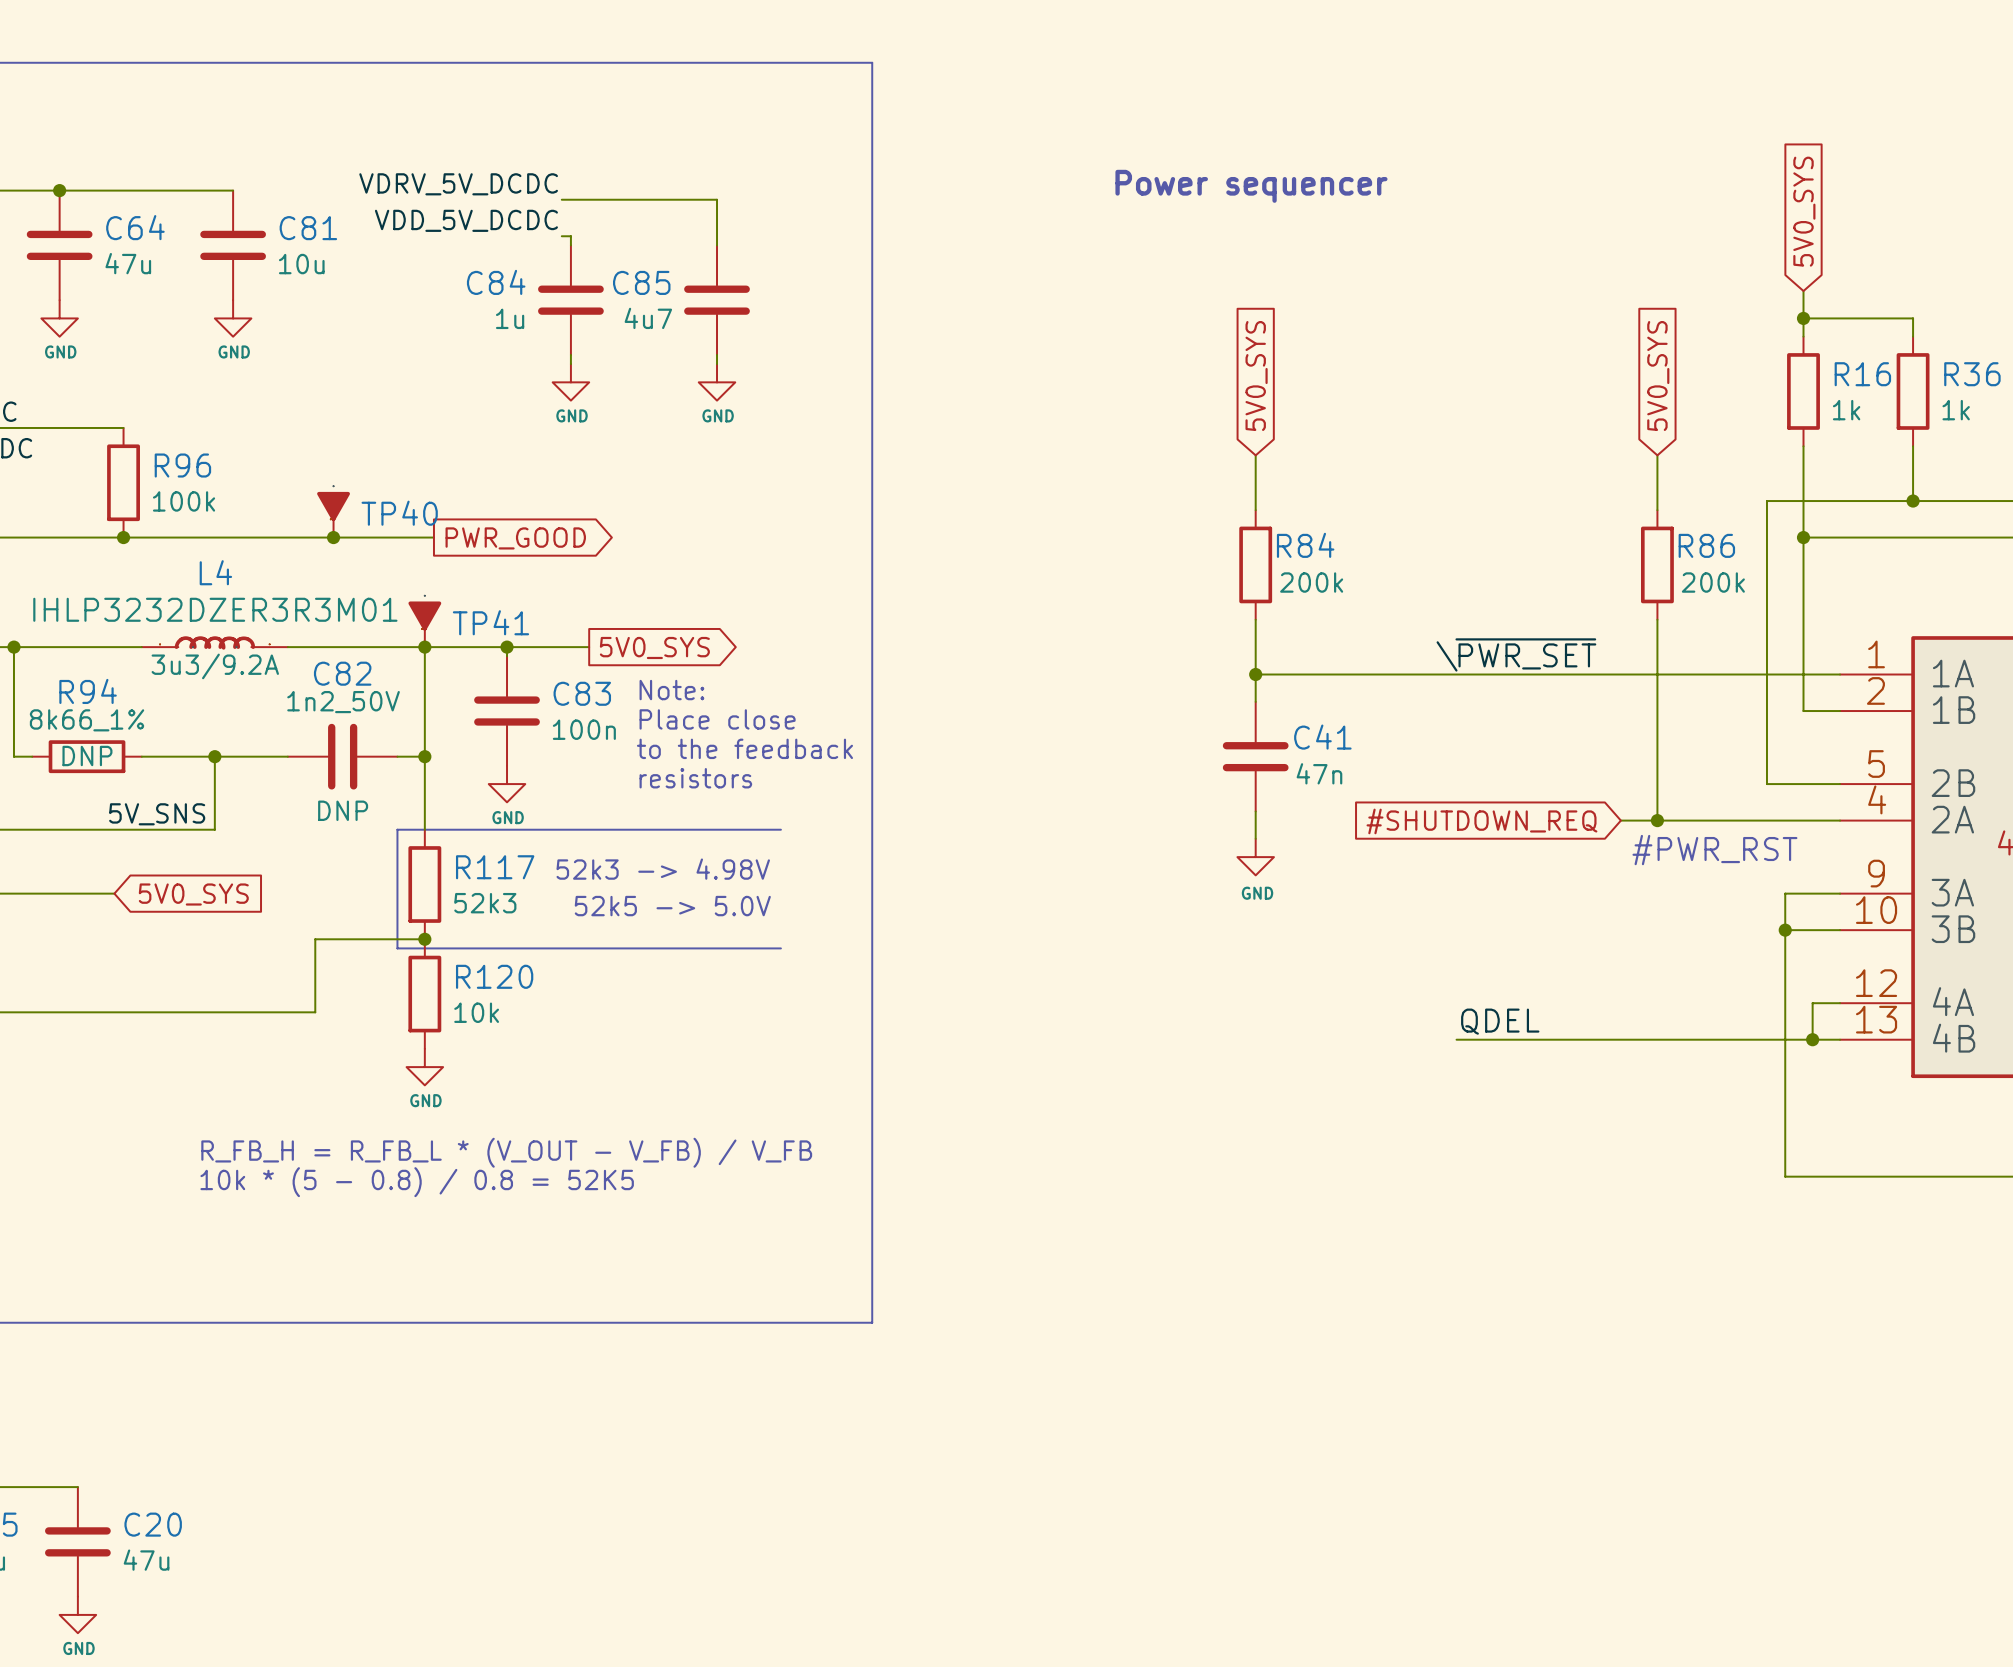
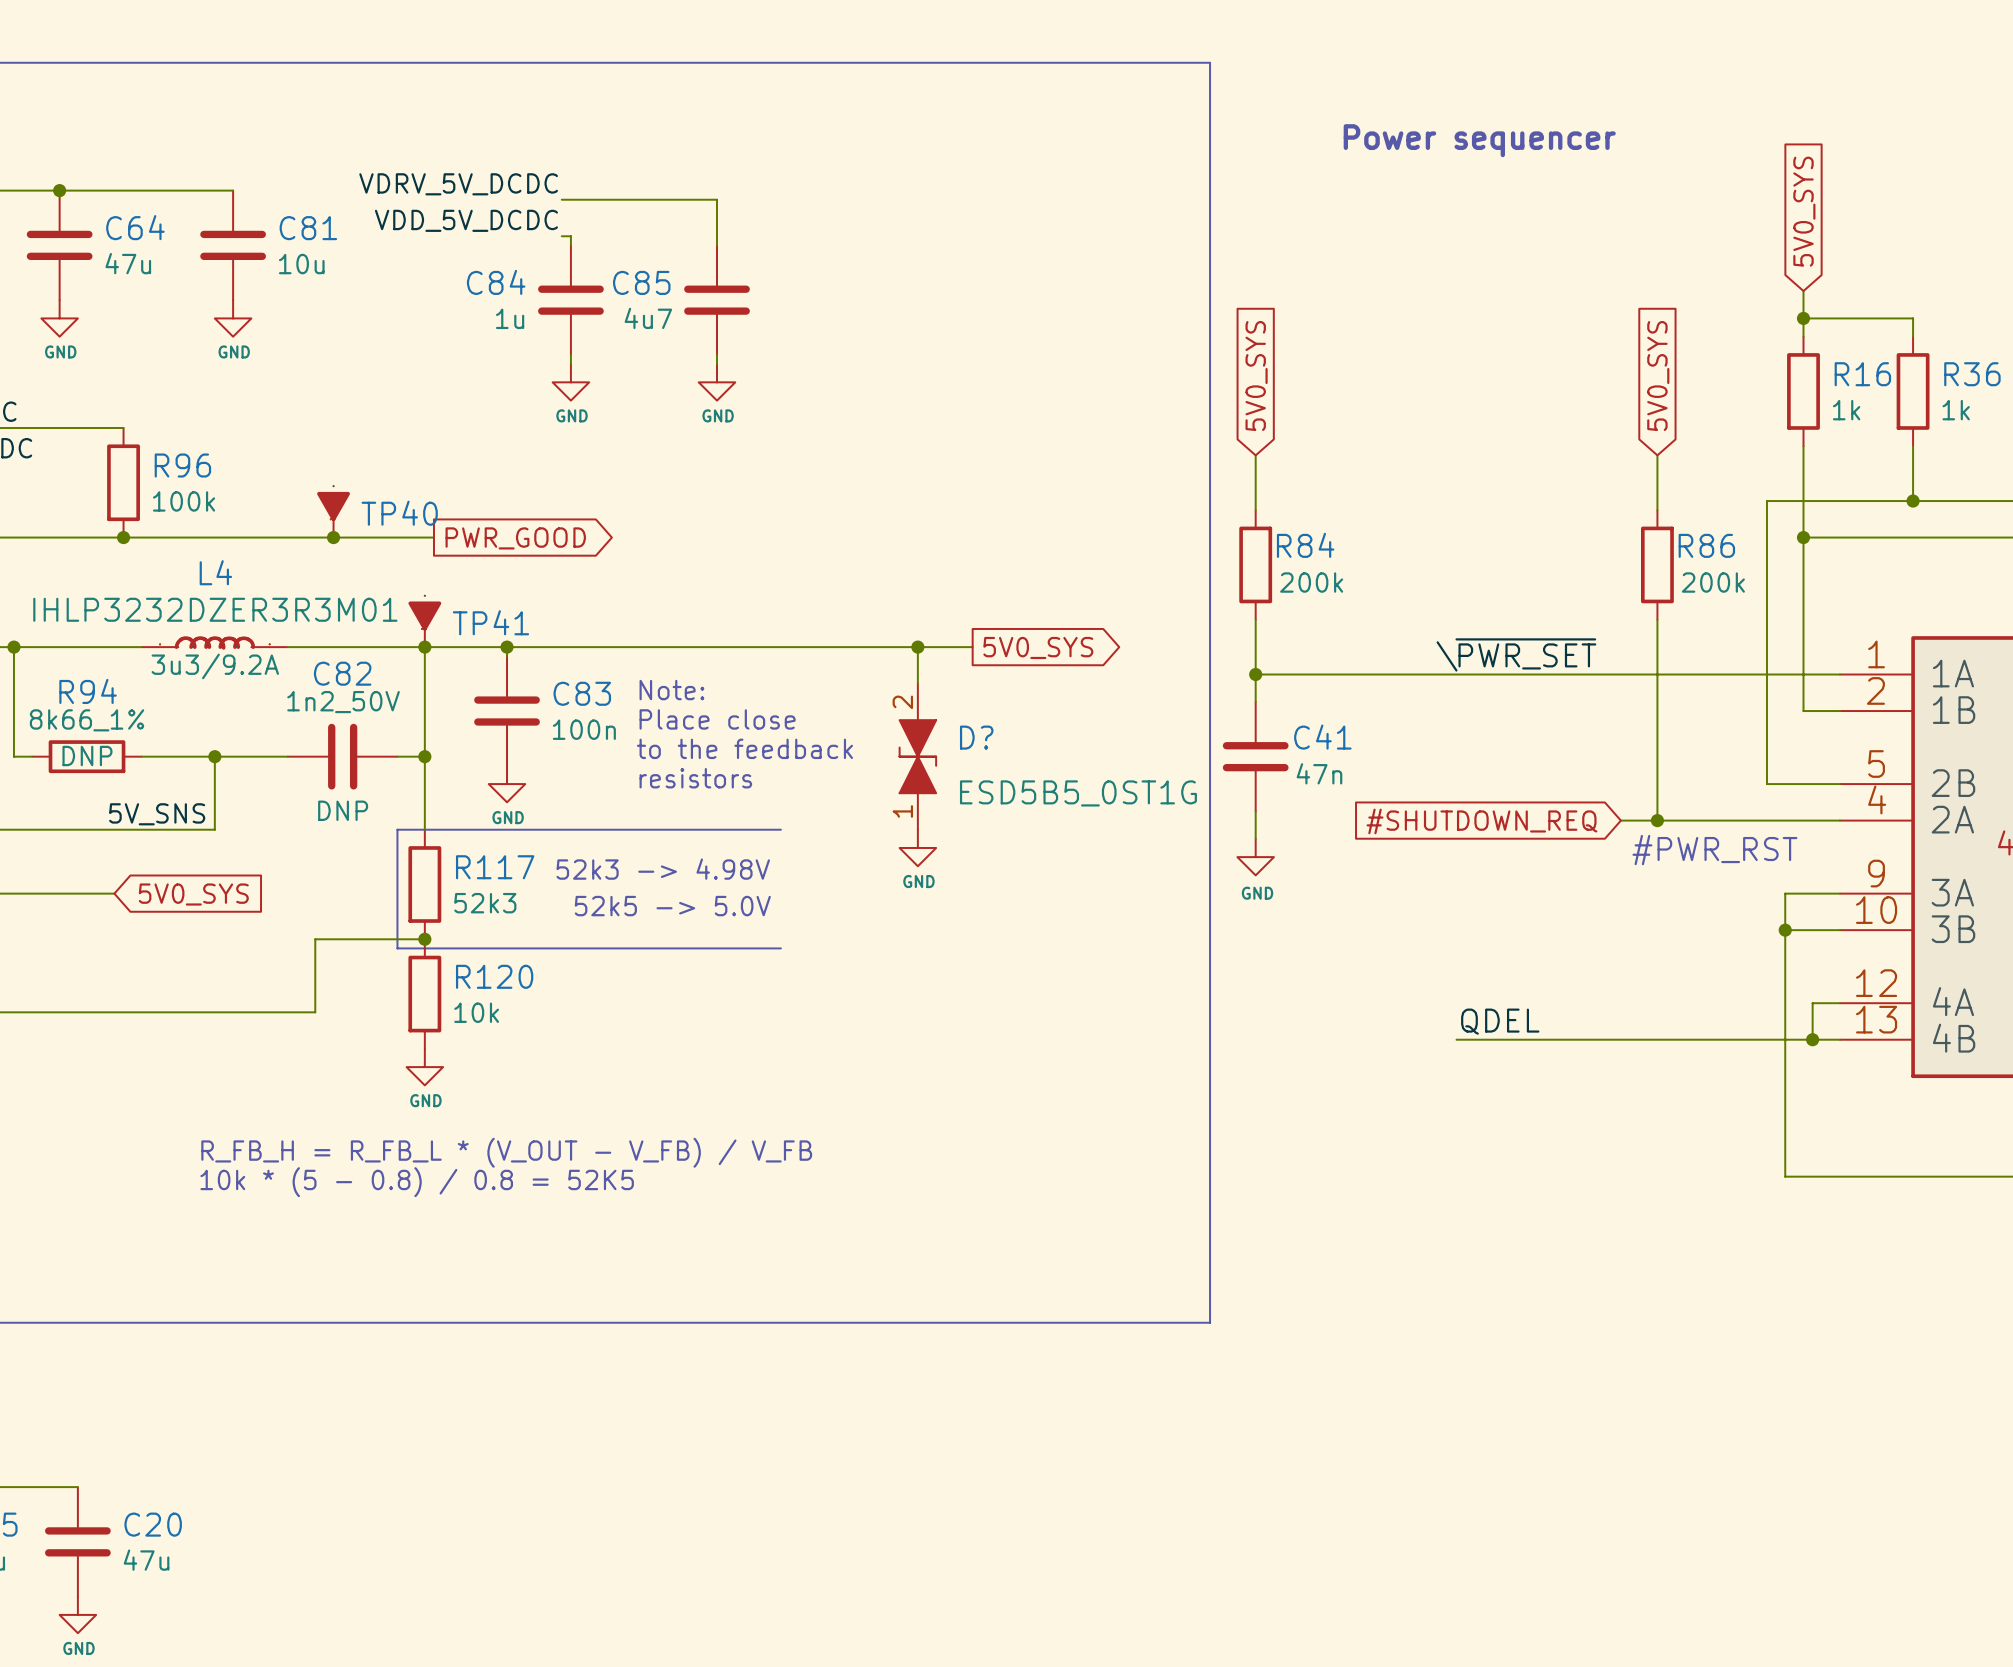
line: (872, 62) (872, 1322) -> (872, 62) (1210, 62) (1210, 1322) (872, 1322)
text position: Power sequencer (1251, 186) -> Power sequencer (1479, 140)
wire: none -> (589, 647) (972, 647)
global label: 5V0_SYS (654, 647) -> none
wire: none -> (917, 647) (917, 683)
junction: none -> (917, 647)
global label: none -> 5V0_SYS (1038, 647)
D?: none -> ESD5B5_0ST1G (917, 756)
power symbol: none -> GND (917, 847)

